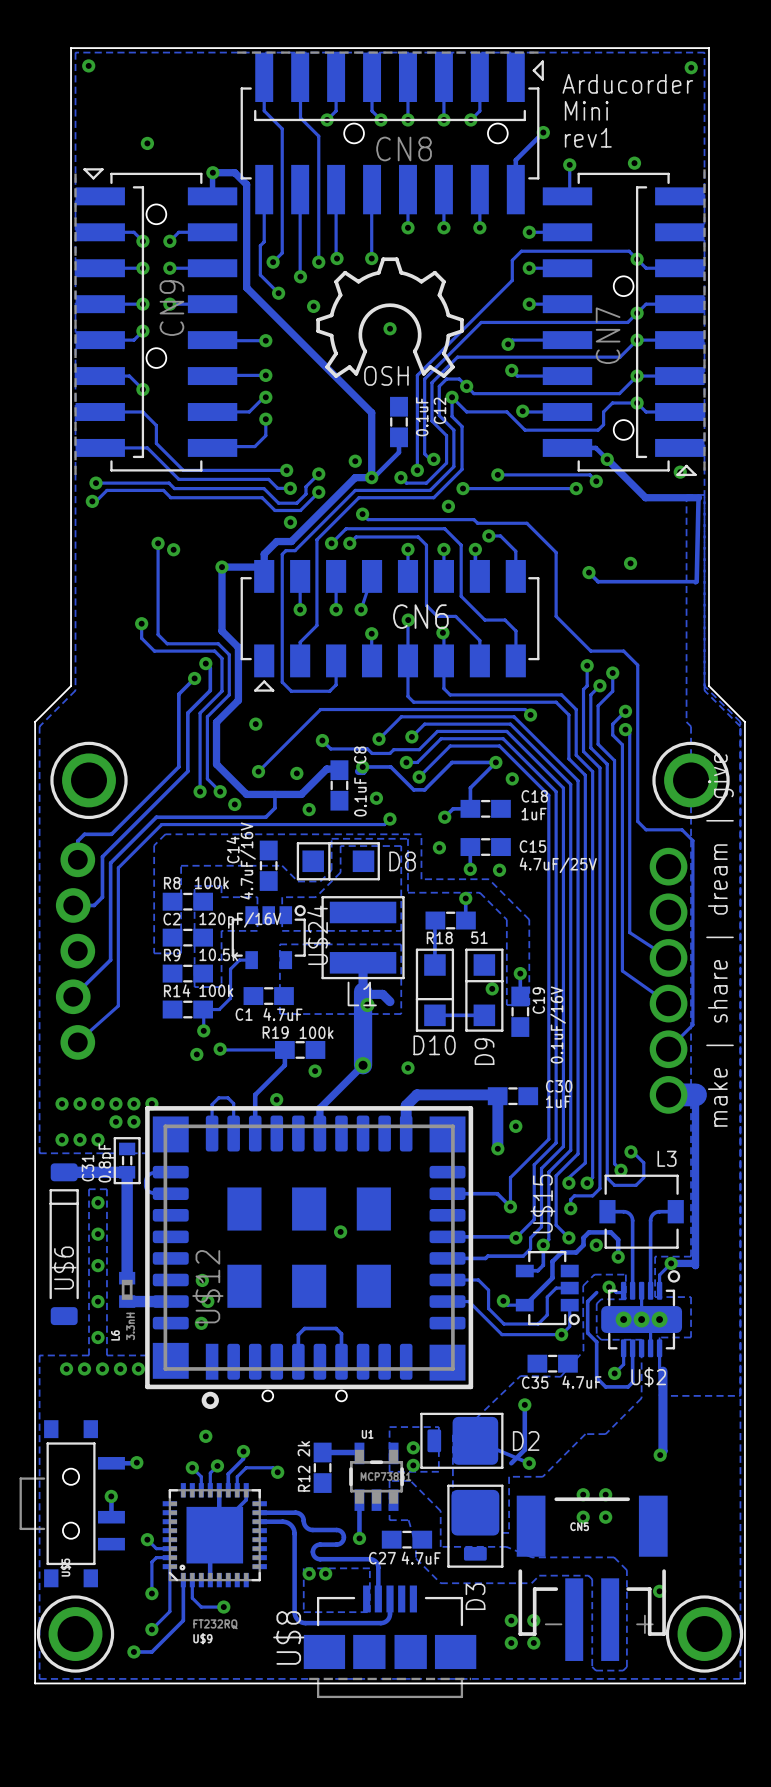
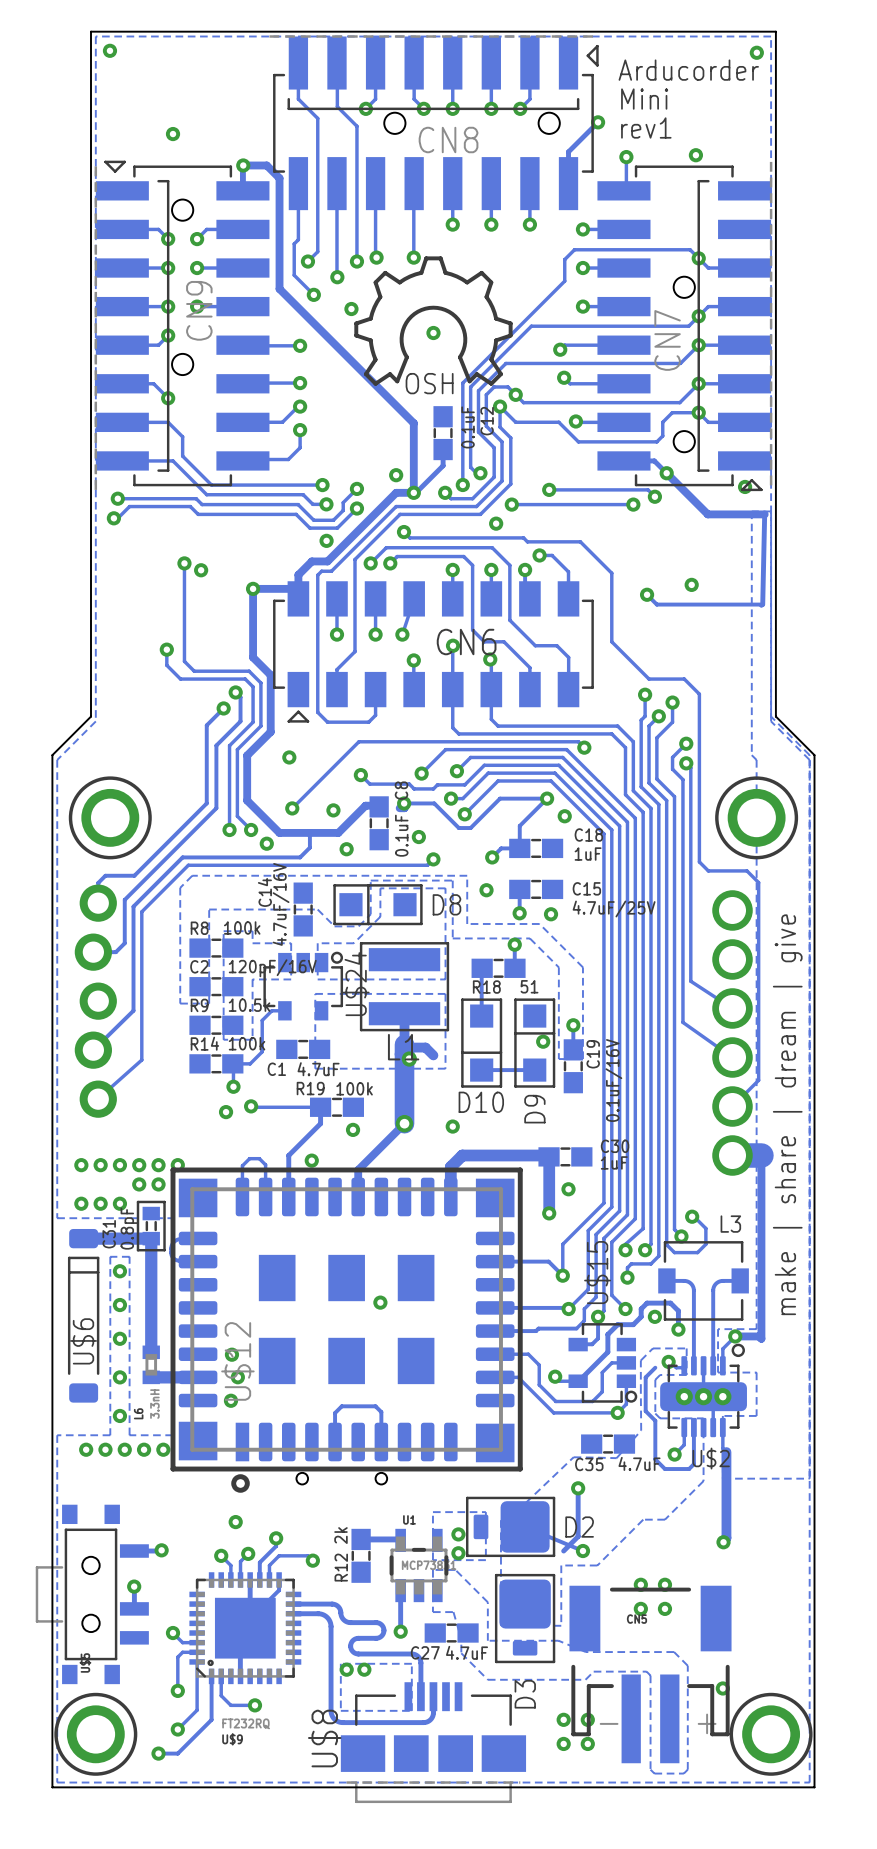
text position: make | share | dream | give (720, 940) -> make | share | dream | give (787, 1114)

